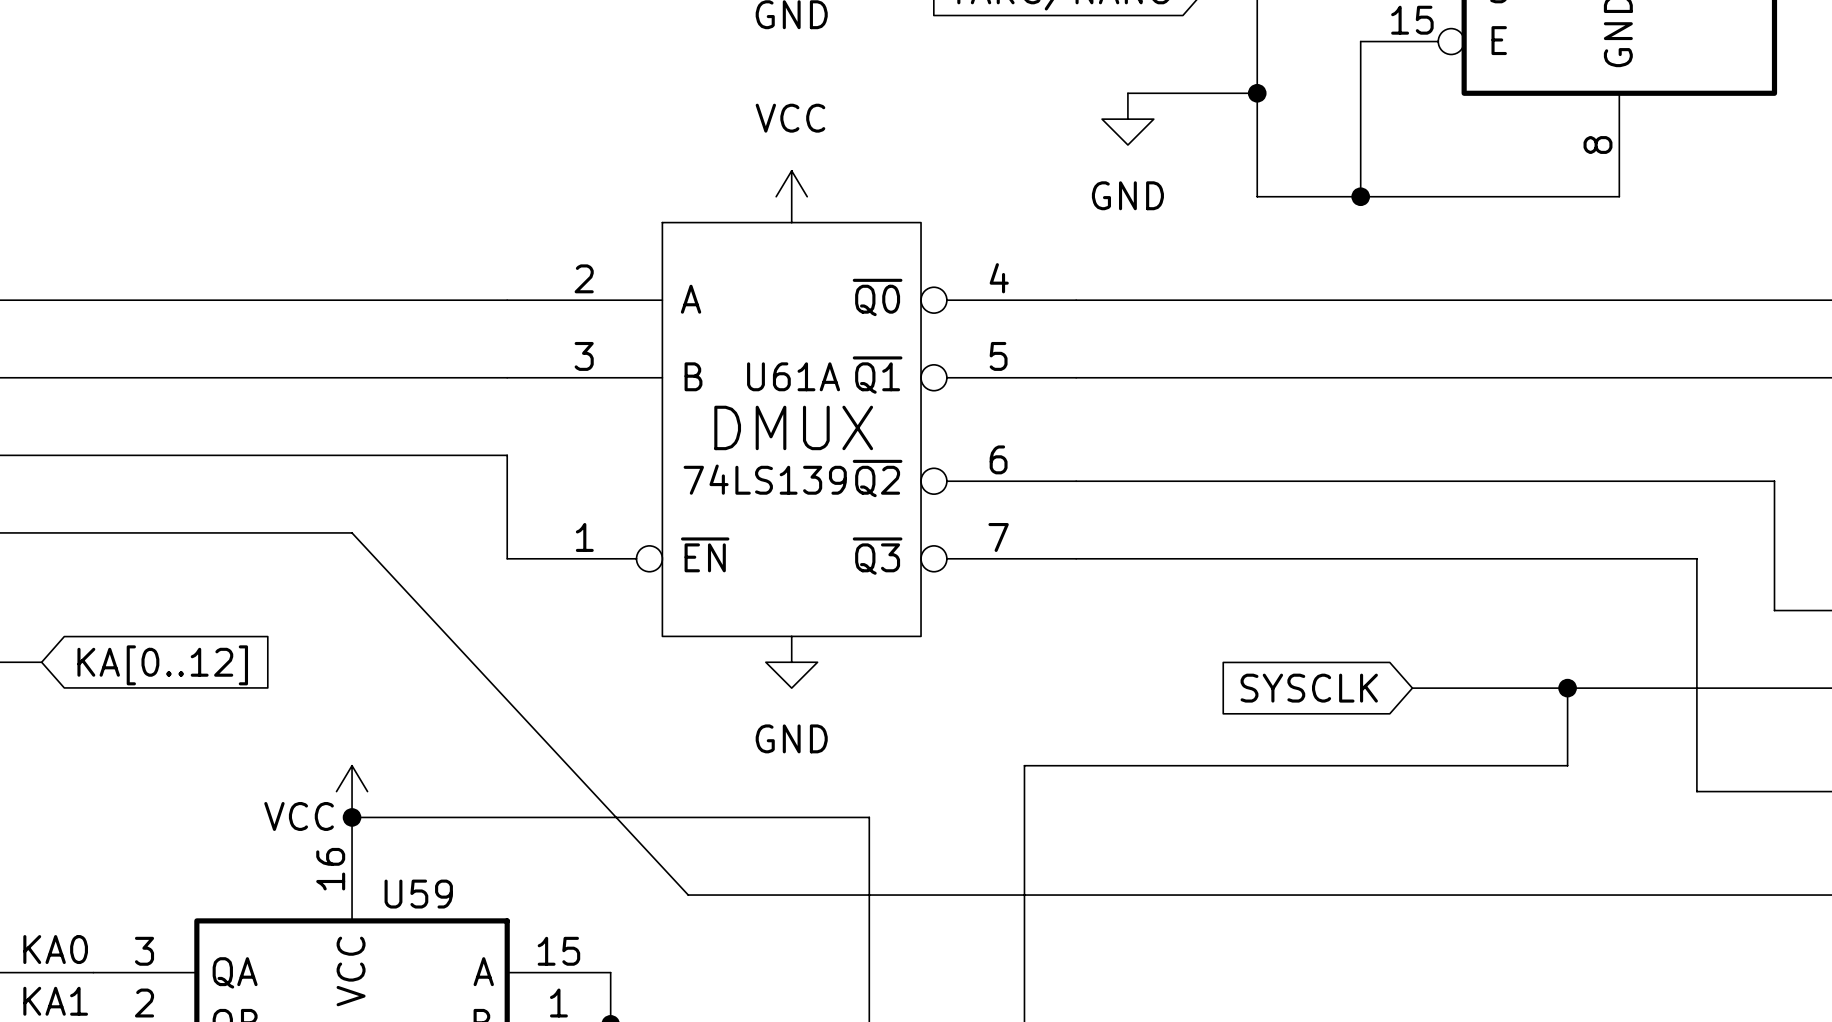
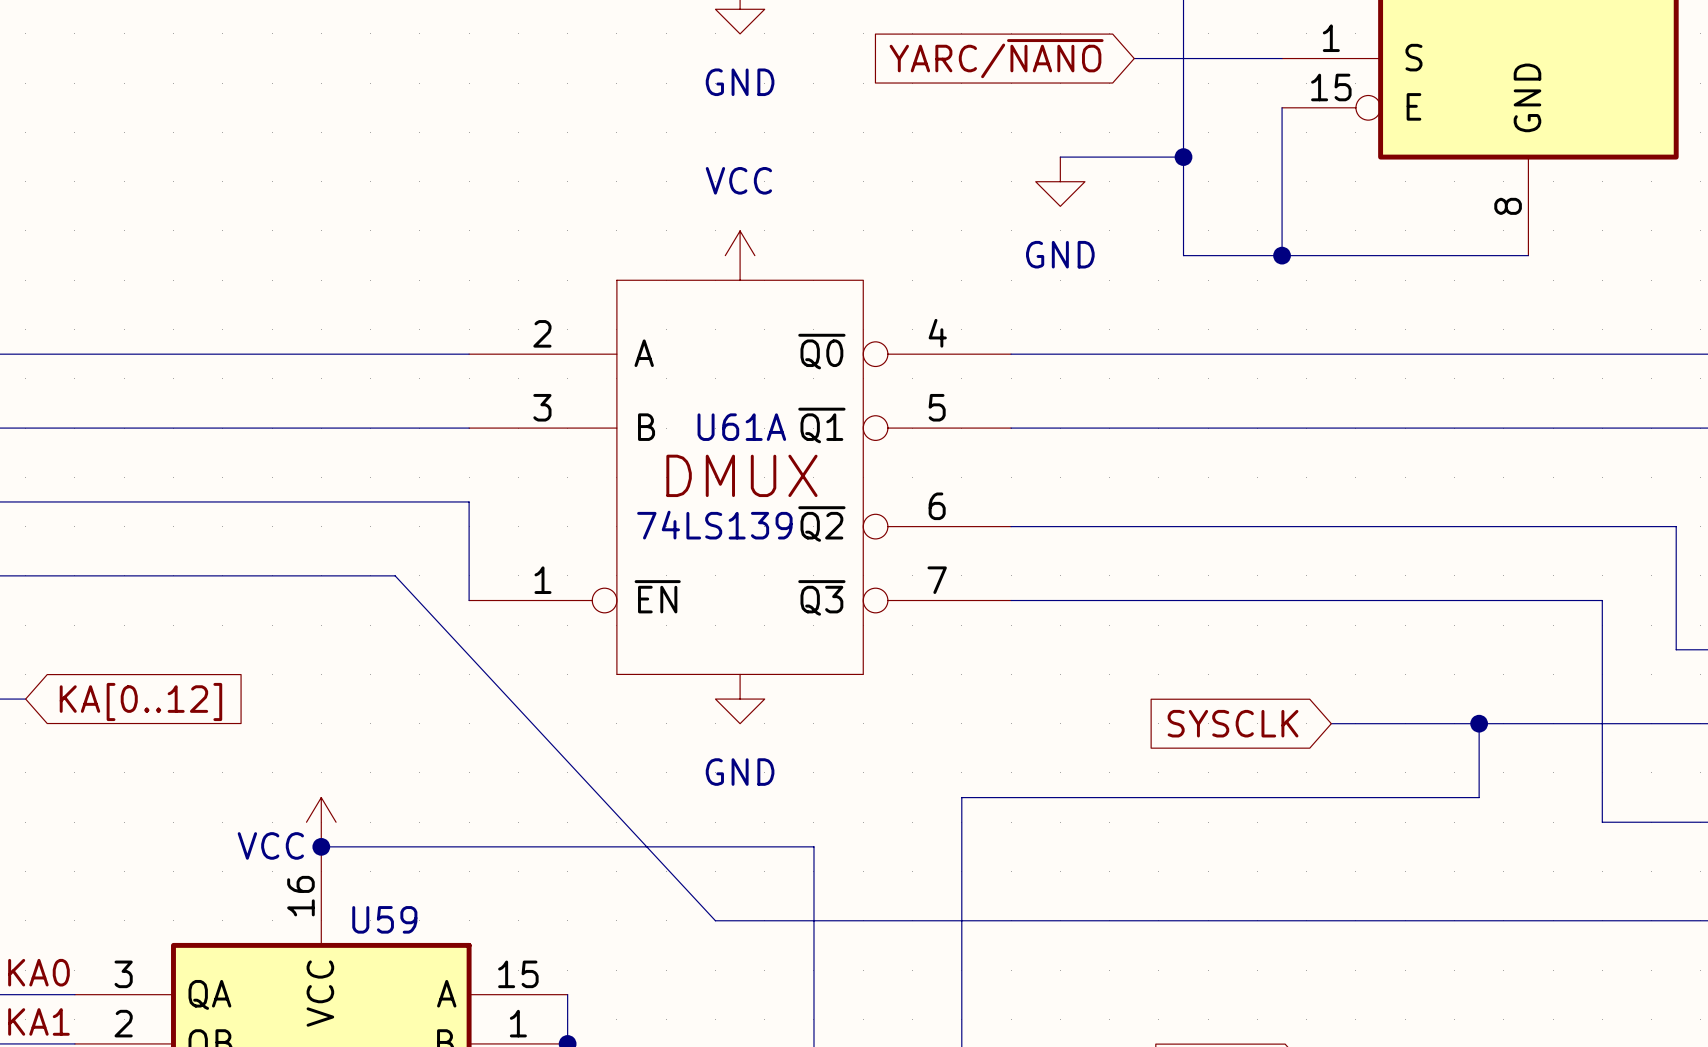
wire: (352, 532) (688, 895) (765, 895) -> (321, 575) (395, 575) (715, 920)

